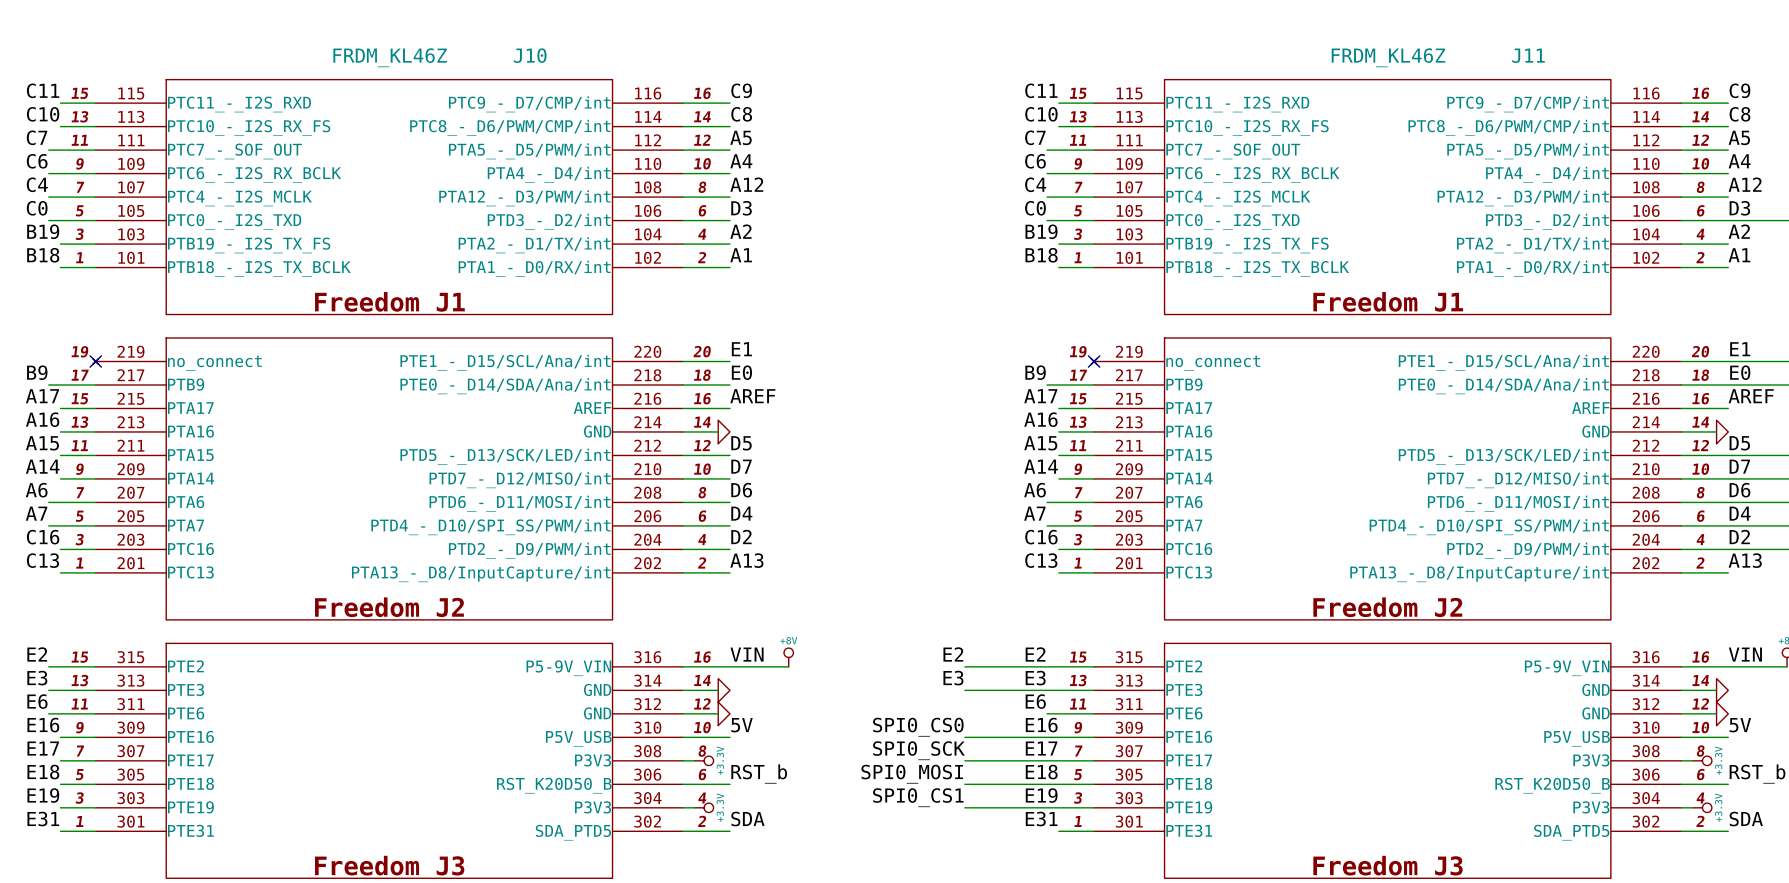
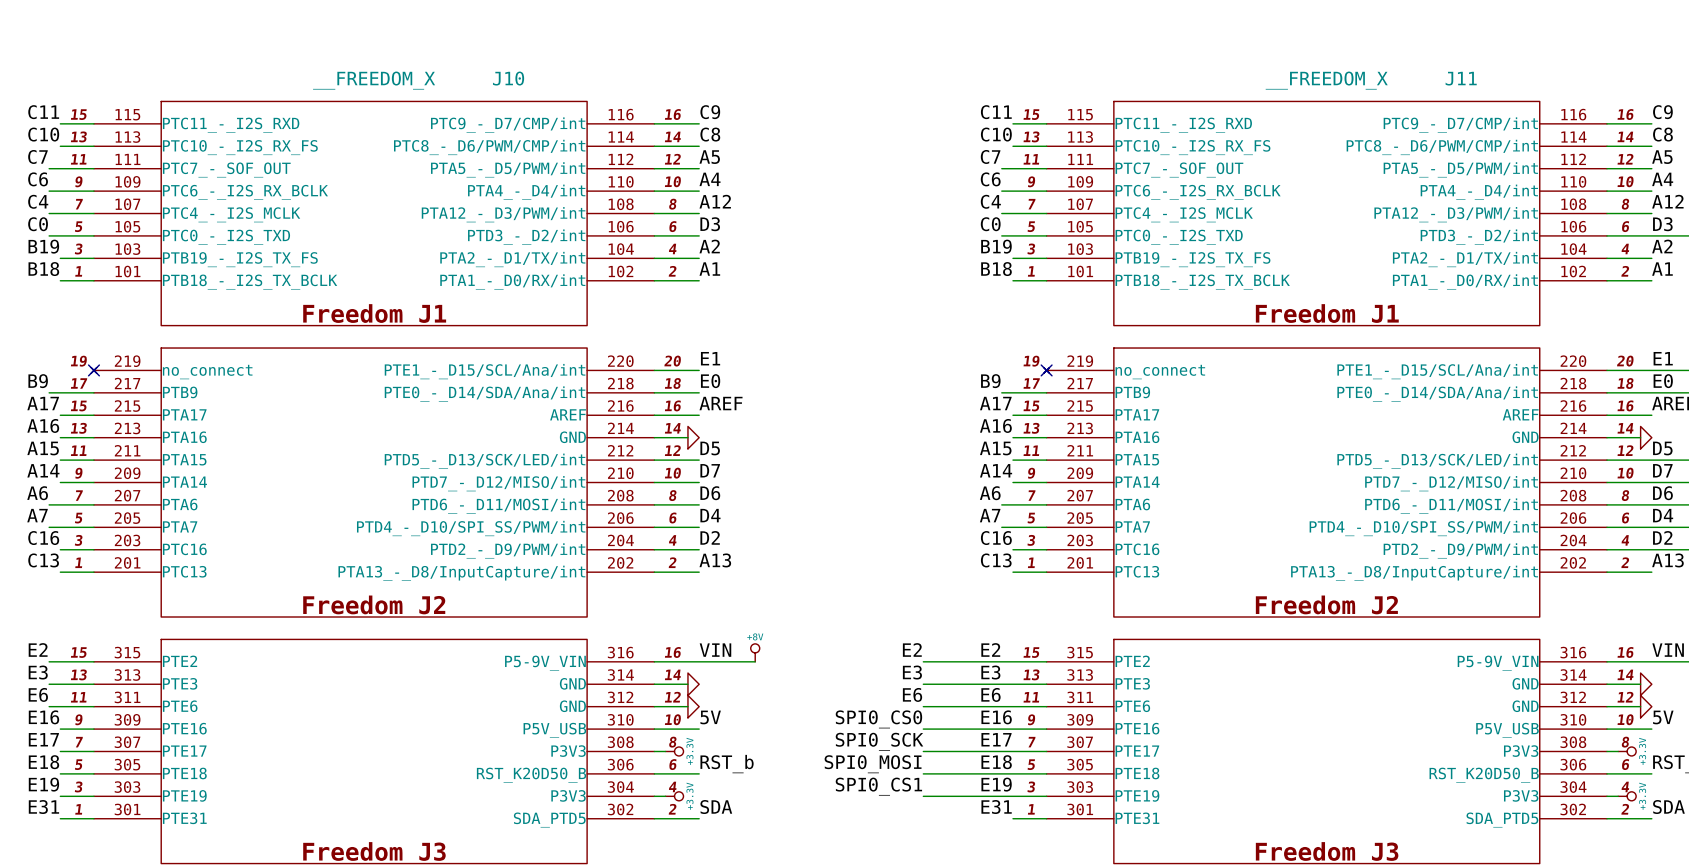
J10 value: FRDM_KL46Z (390, 57) -> __FREEDOM_X (374, 80)
J11 value: FRDM_KL46Z (1388, 57) -> __FREEDOM_X (1326, 80)
label: none -> E6 (912, 694)
wire: none -> (923, 706) (1001, 706)

